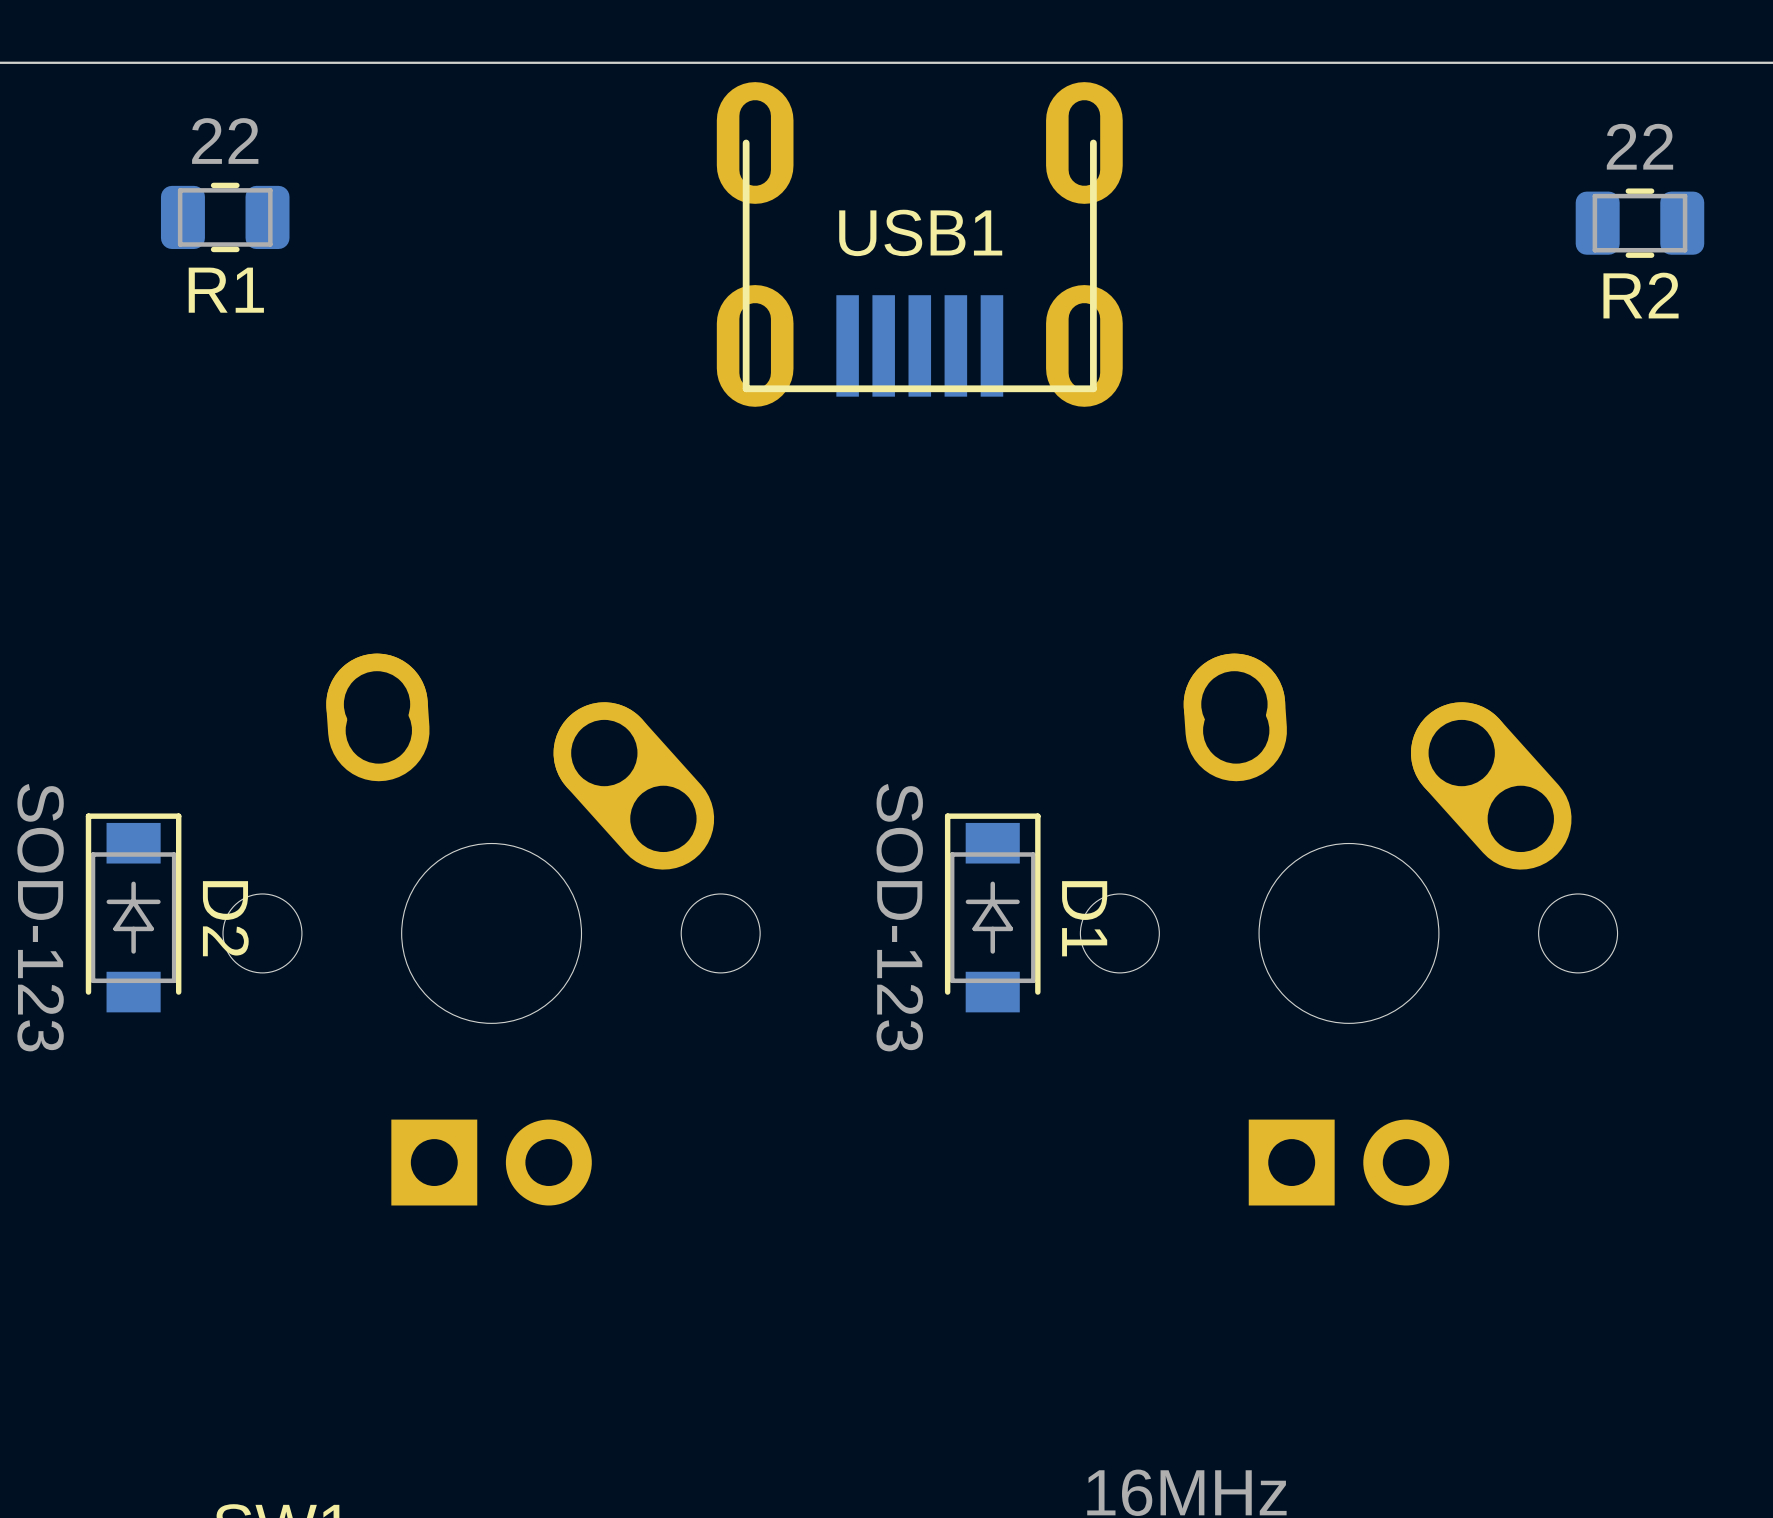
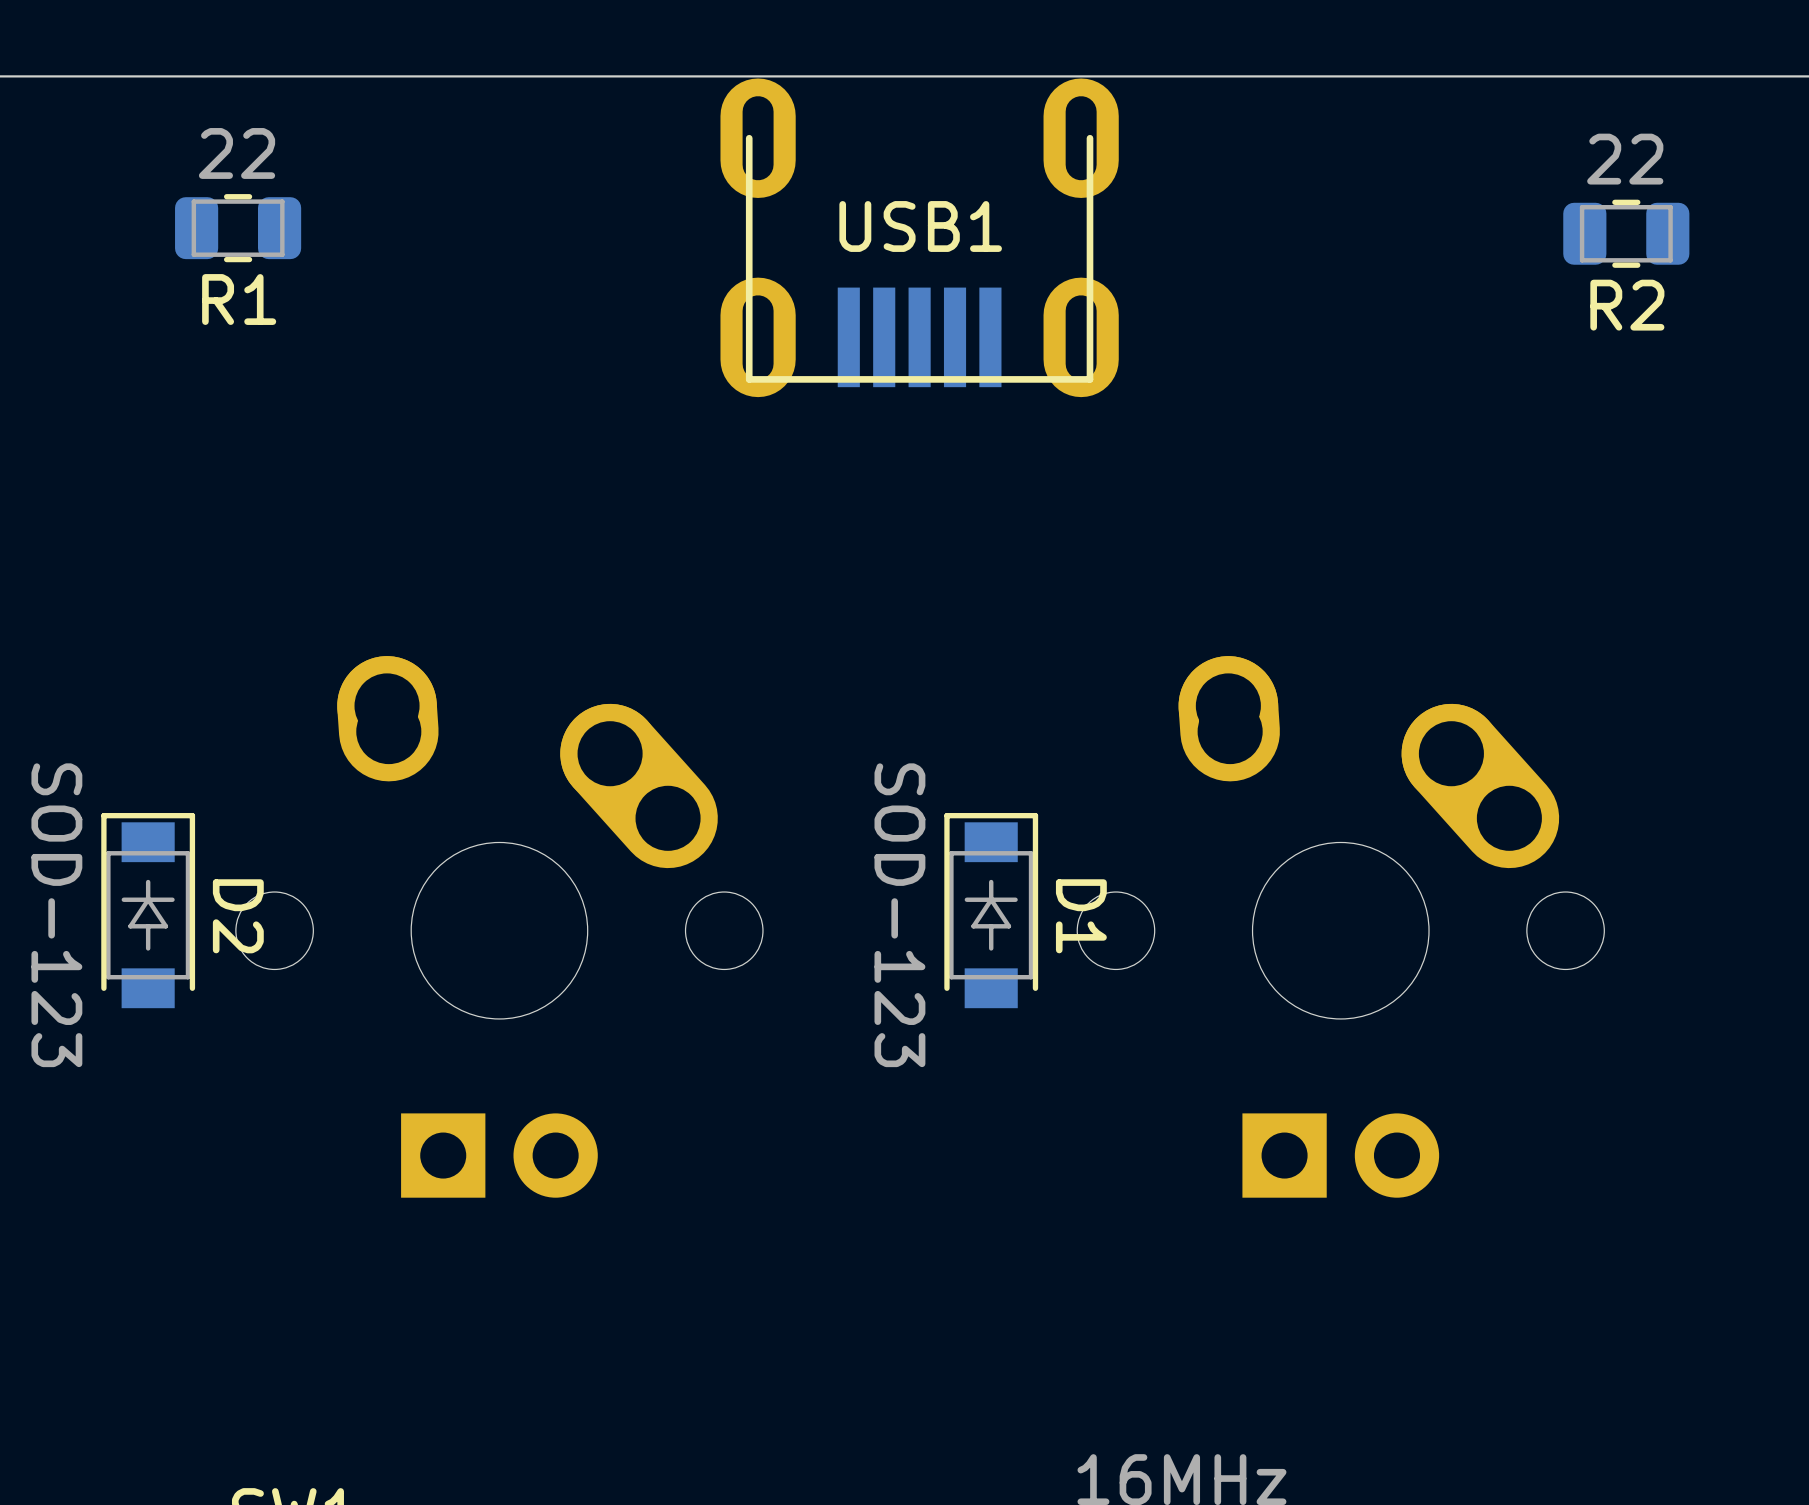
USB1 position: (919, 244) -> (919, 237)

